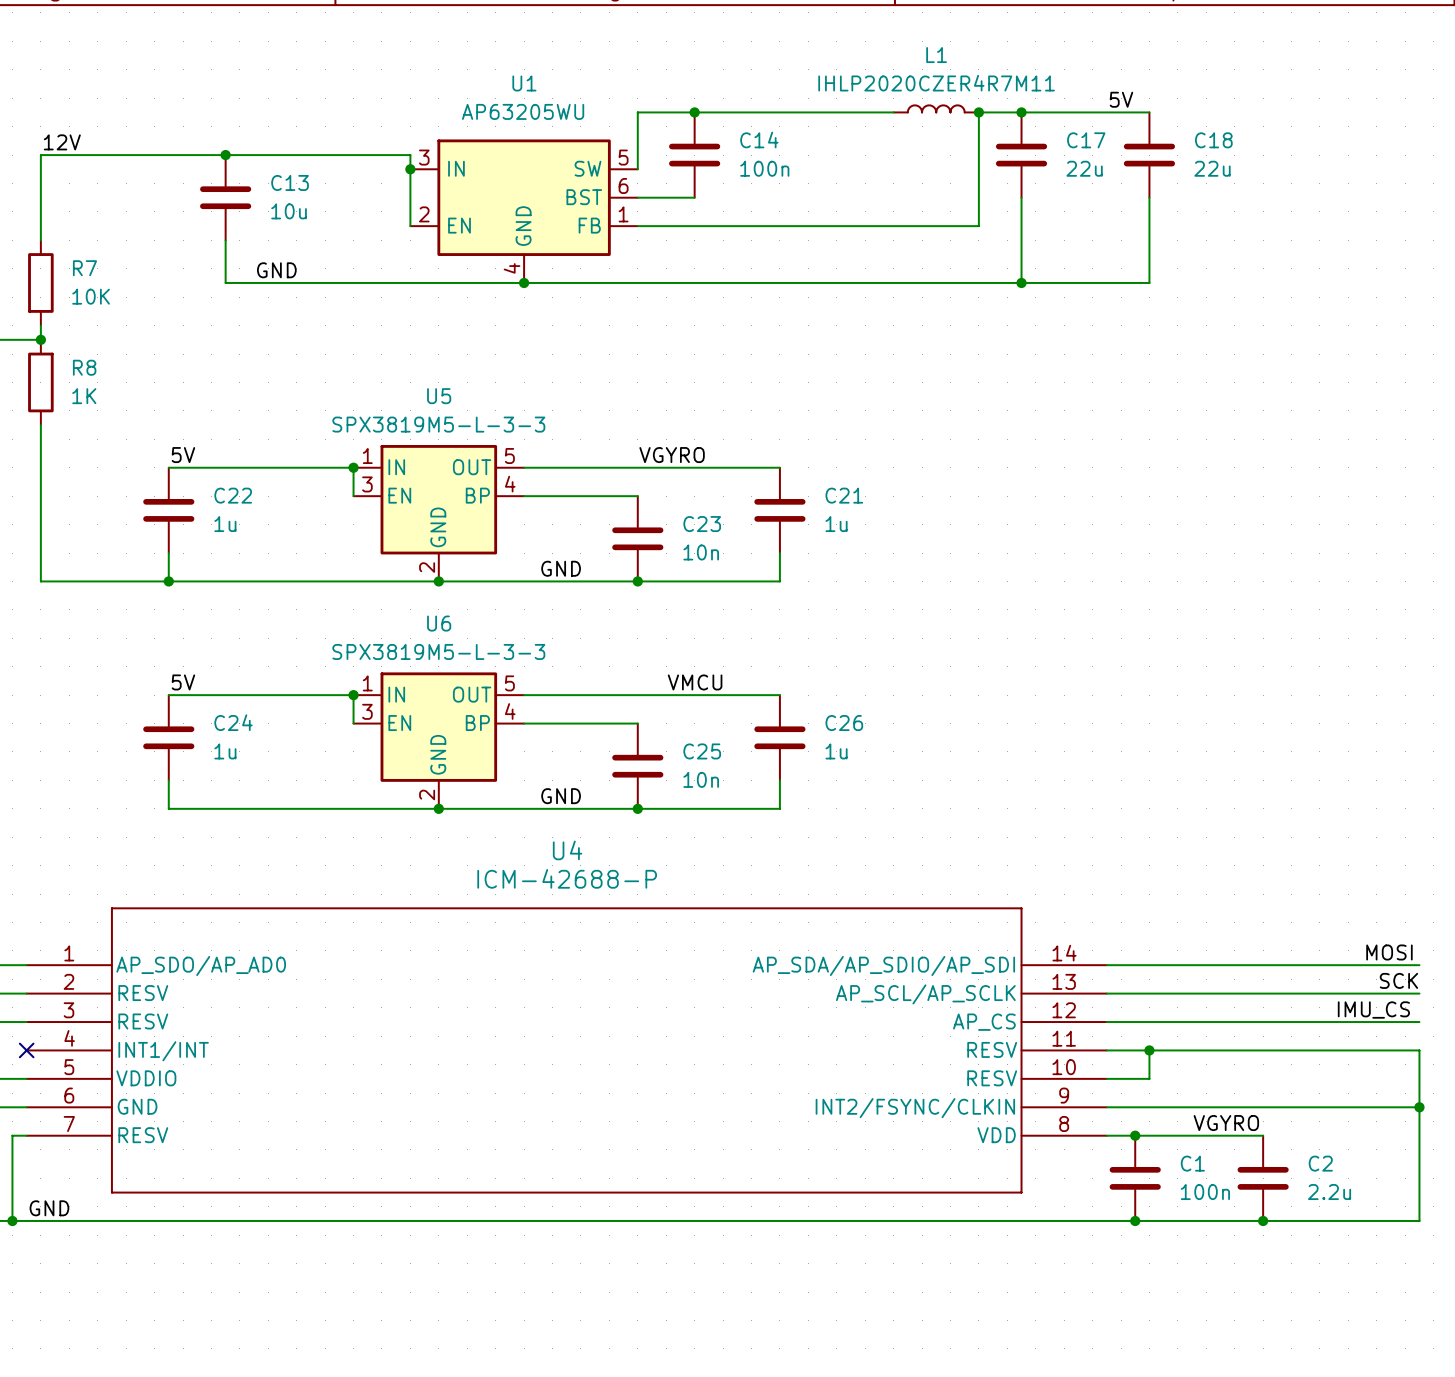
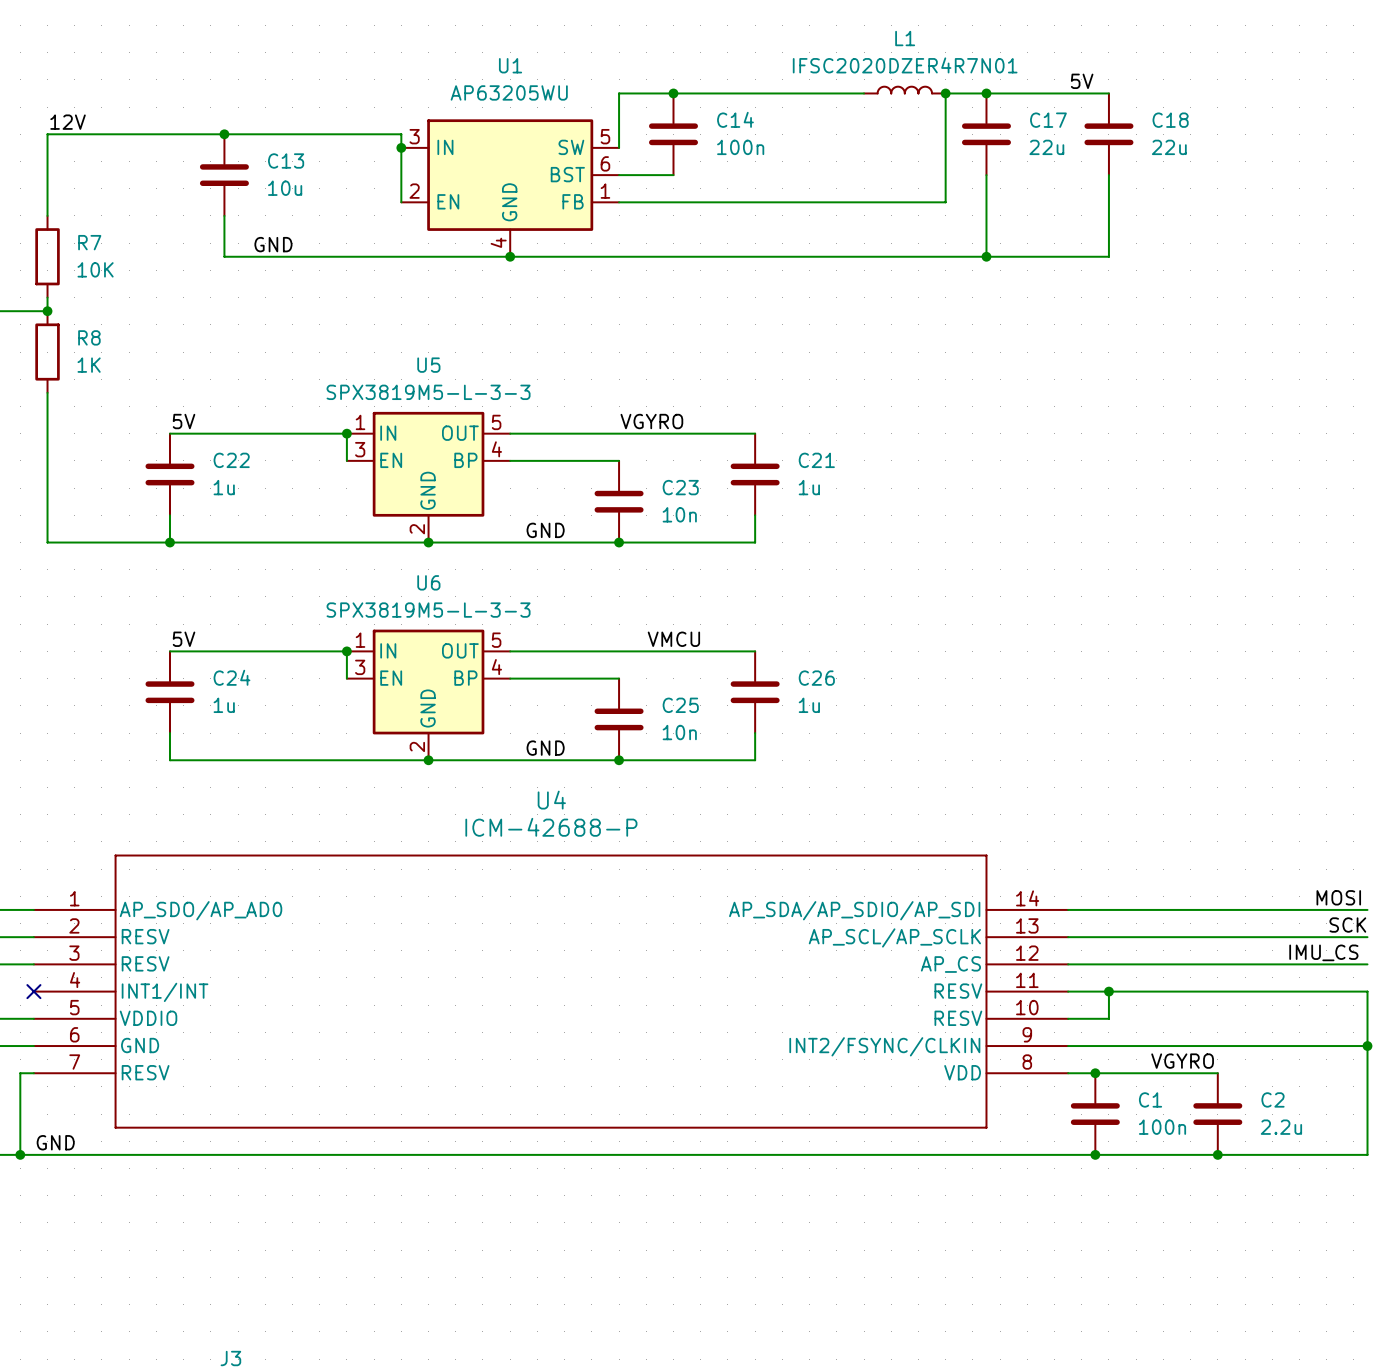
L1 value: IHLP2020CZER4R7M11 (936, 83) -> IFSC2020DZER4R7N01 (905, 65)

